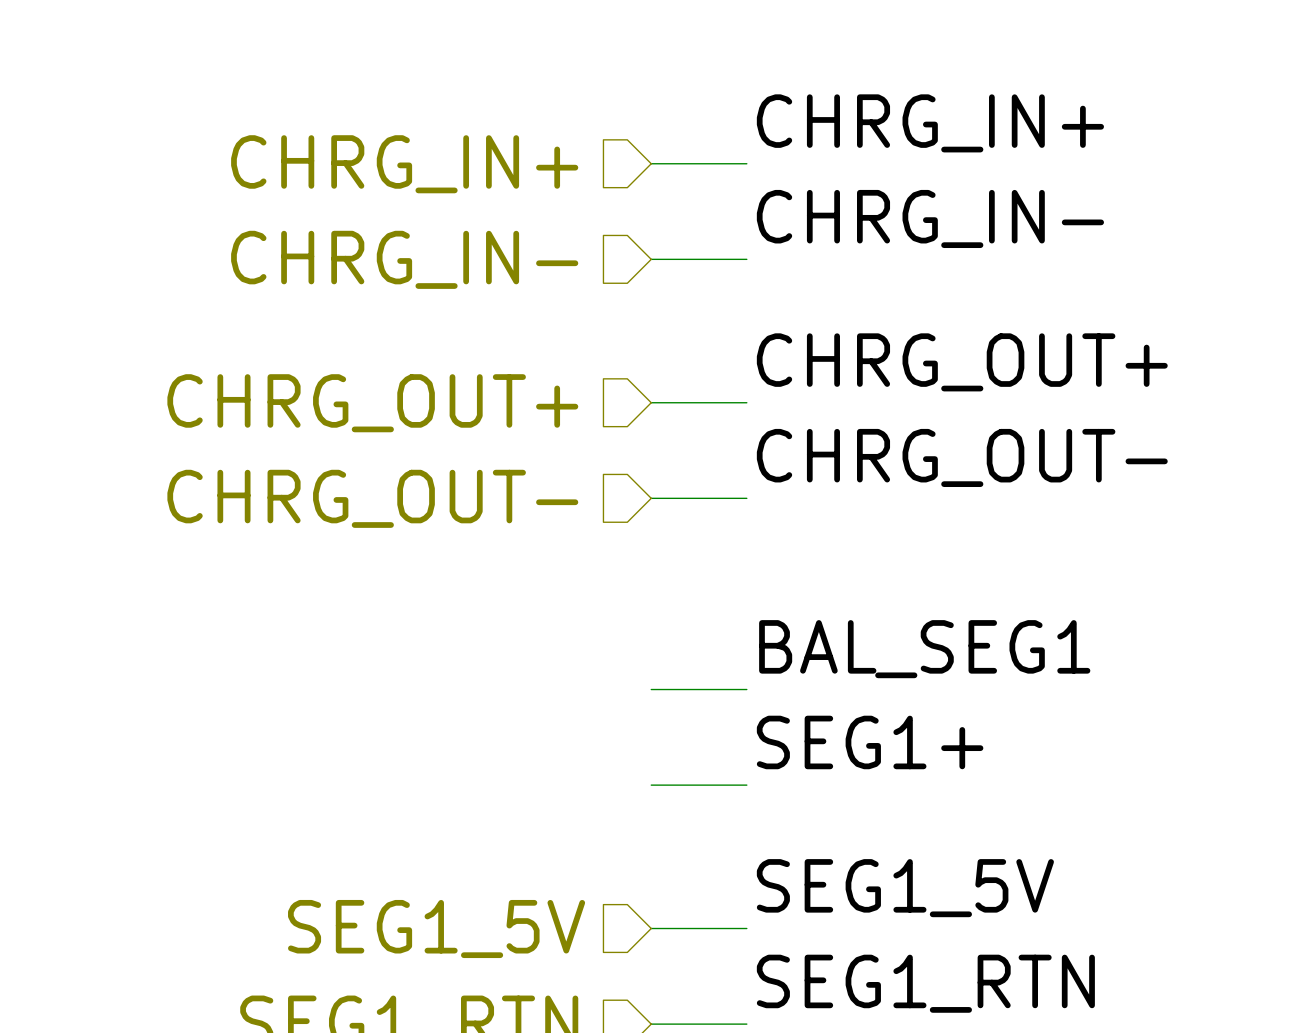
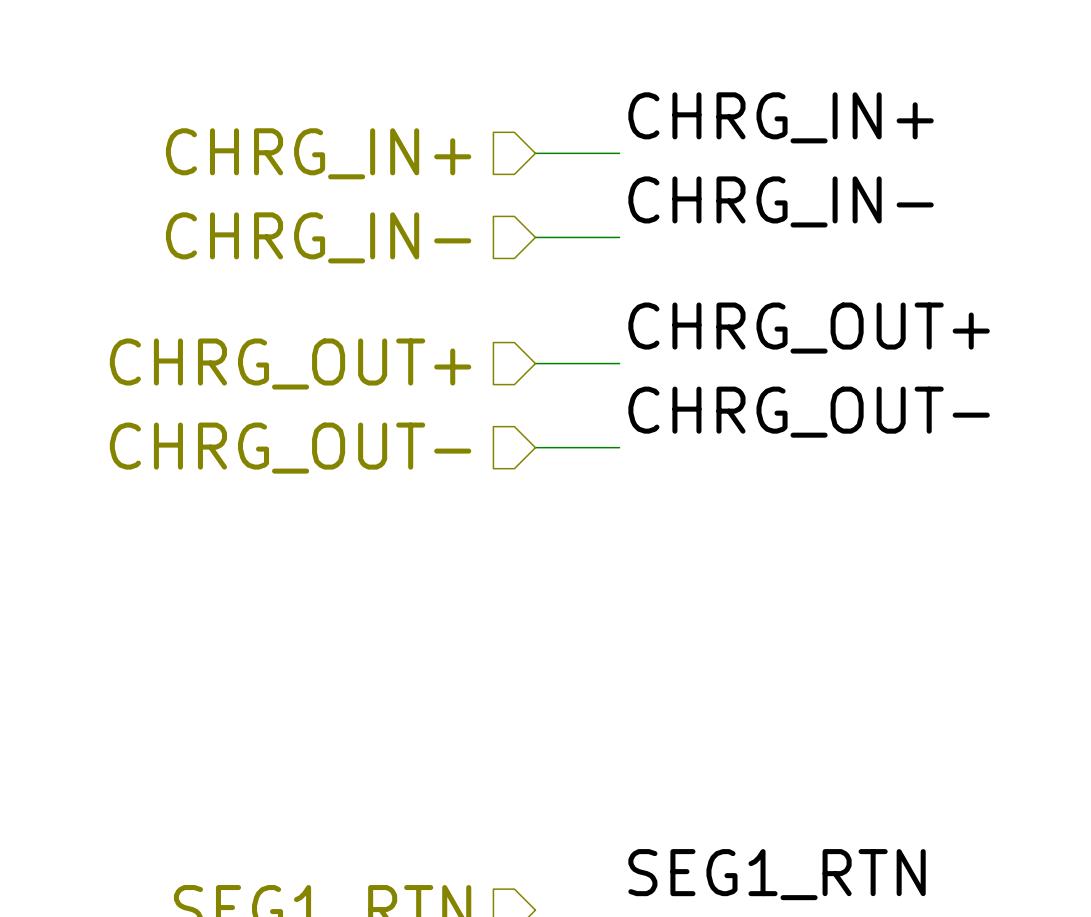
label: BAL_SEG1 (924, 649) -> none
wire: (651, 689) (746, 689) -> none
label: SEG1+ (870, 742) -> none
wire: (651, 785) (746, 785) -> none
label: SEG1_5V (905, 888) -> none
wire: (651, 928) (746, 928) -> none
hierarchical label: SEG1_5V (436, 929) -> none
wire: (651, 1024) (746, 1024) -> none

